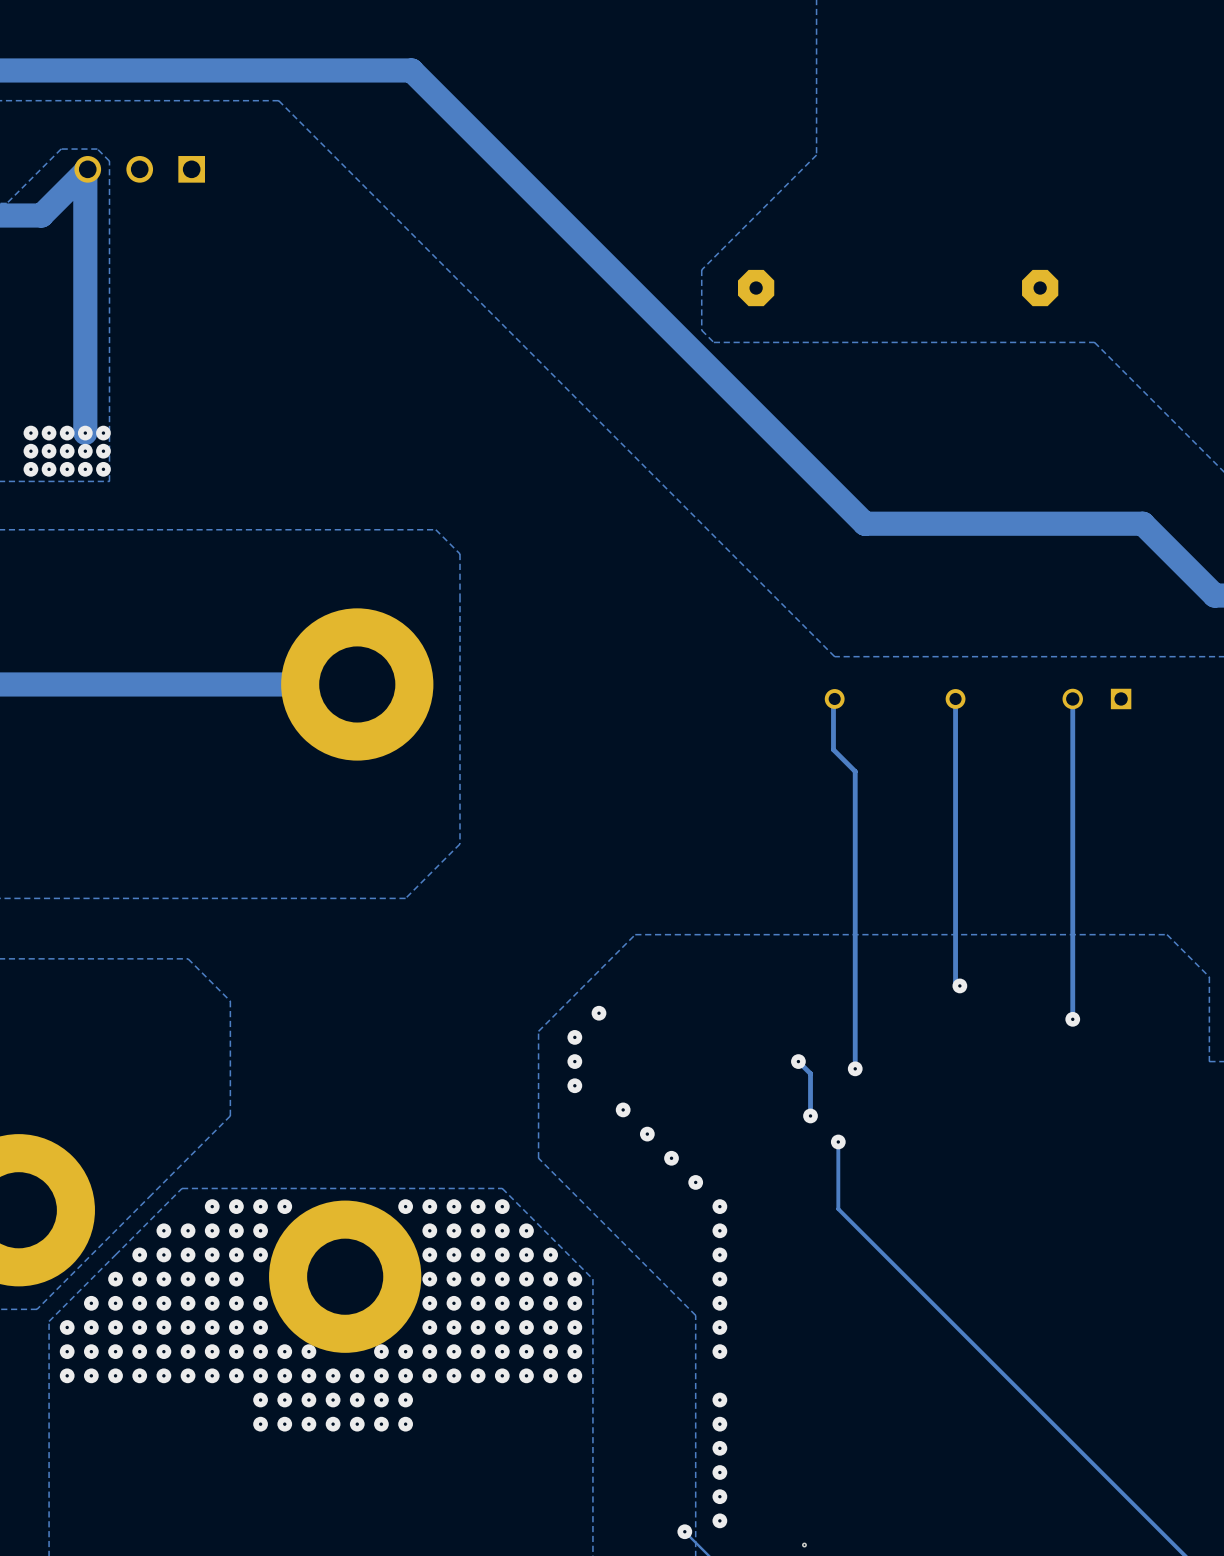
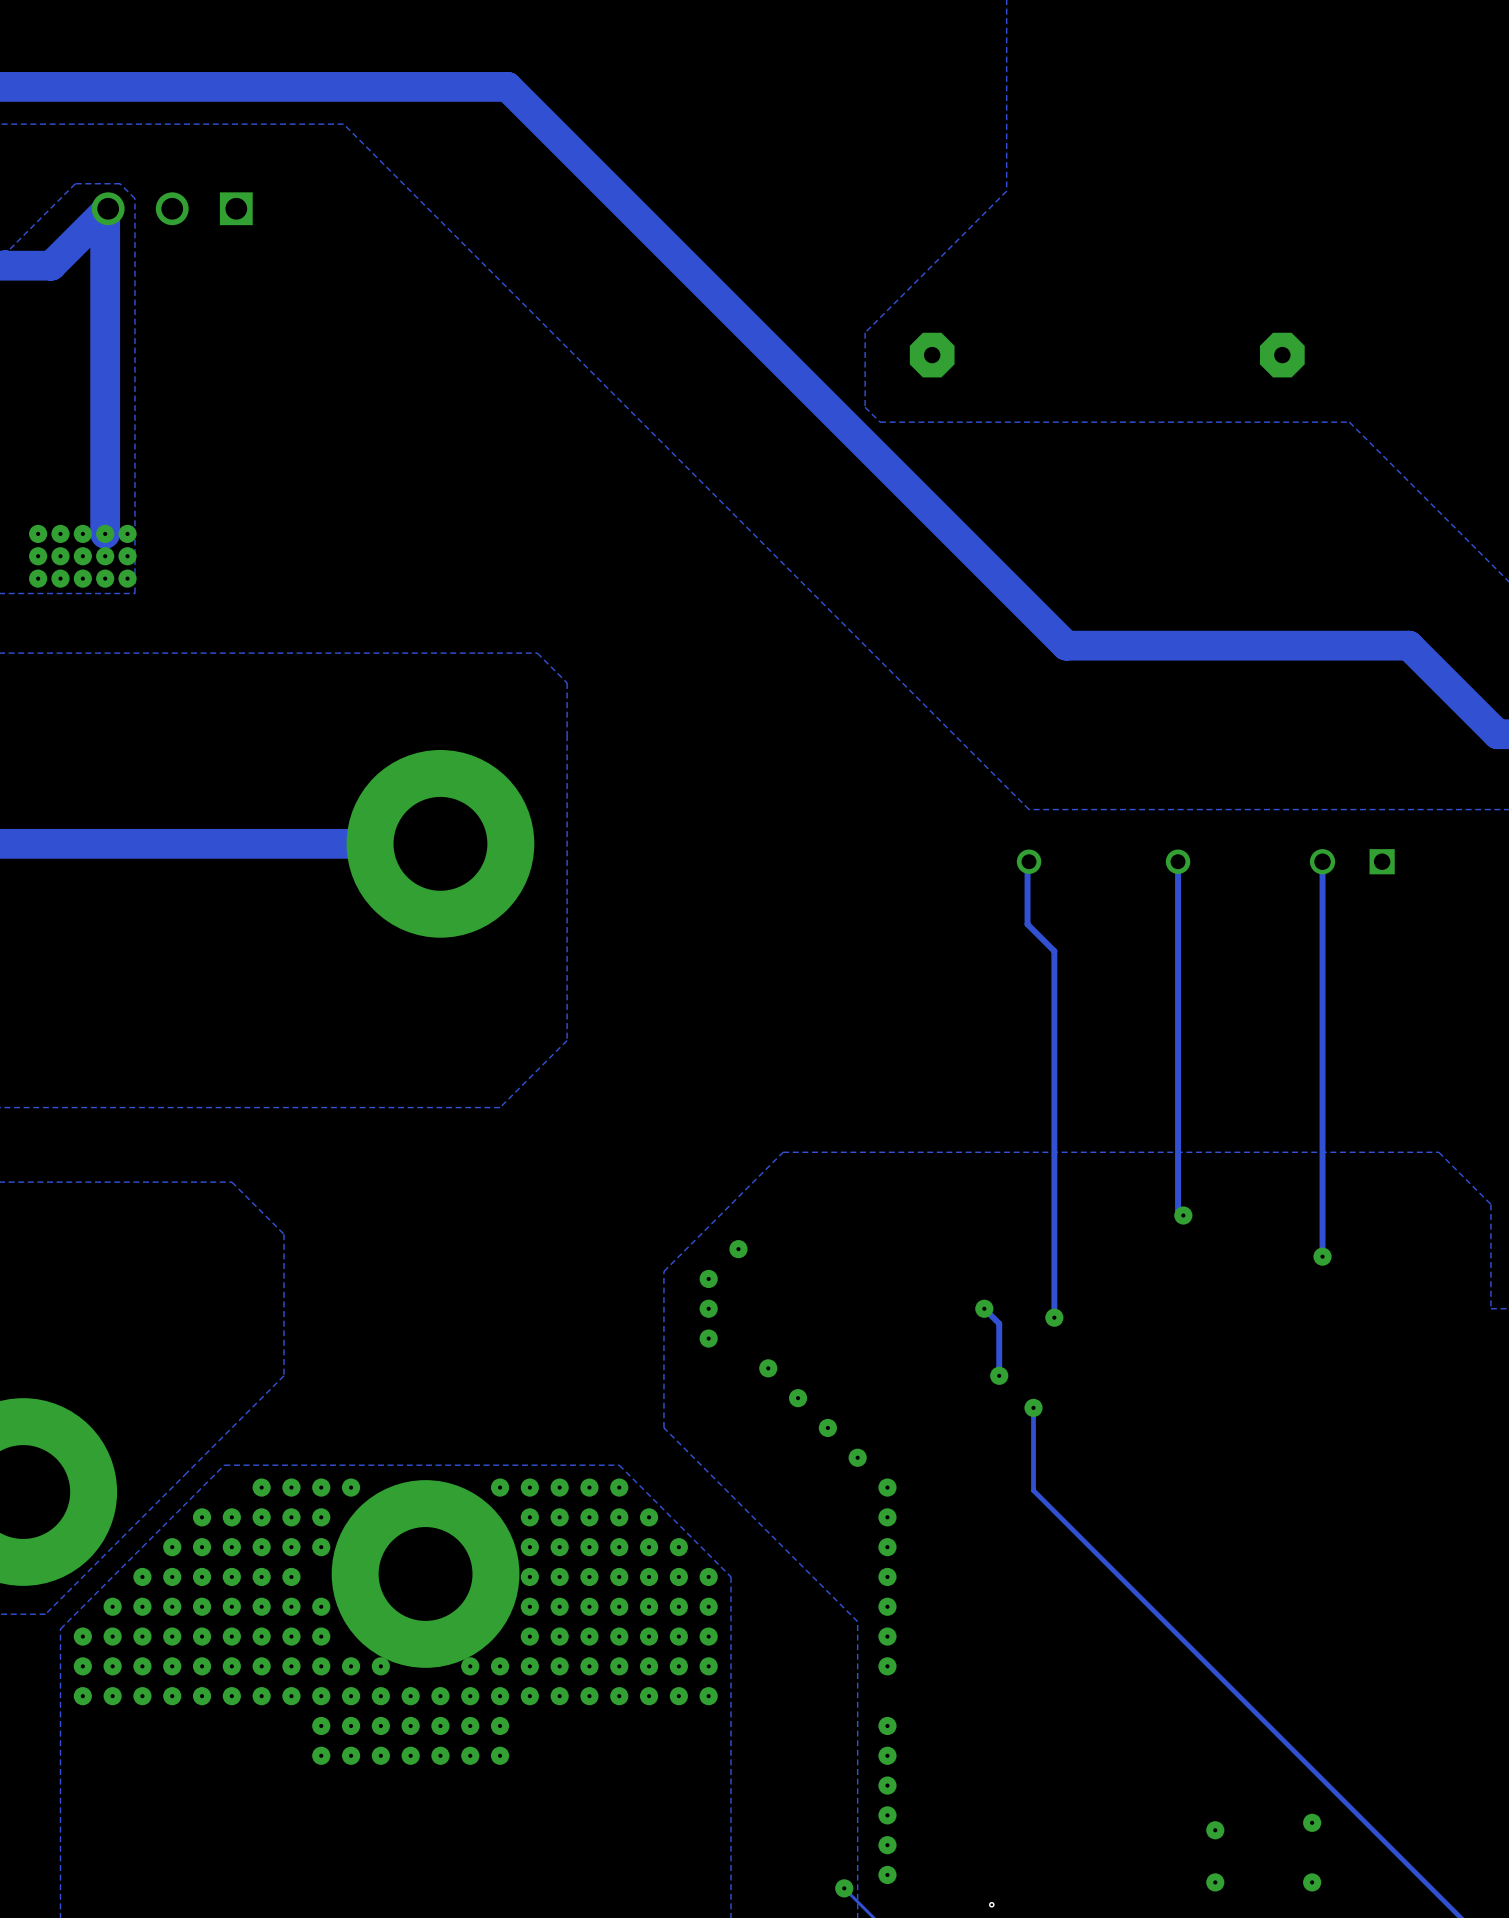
via: none -> (1312, 1822)
via: none -> (1215, 1830)
via: none -> (1215, 1882)
via: none -> (1312, 1882)

